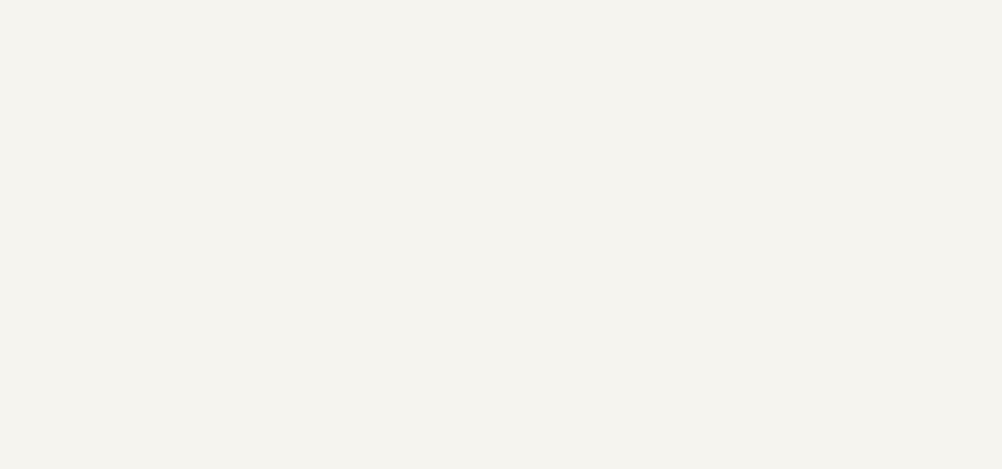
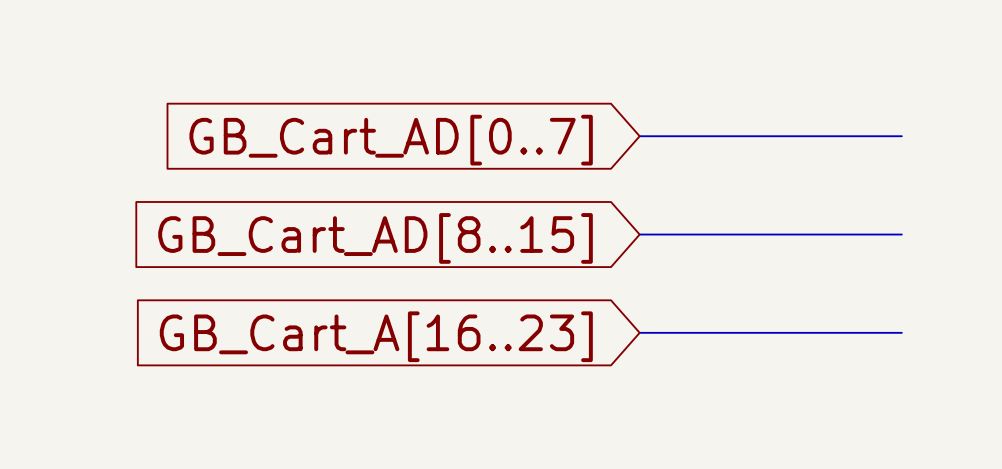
bus: none -> (639, 136) (901, 136)
global label: none -> GB_Cart_AD[0..7] (391, 140)
bus: none -> (639, 234) (901, 234)
global label: none -> GB_Cart_AD[8..15] (375, 238)
bus: none -> (639, 332) (901, 332)
global label: none -> GB_Cart_A[16..23] (376, 336)

